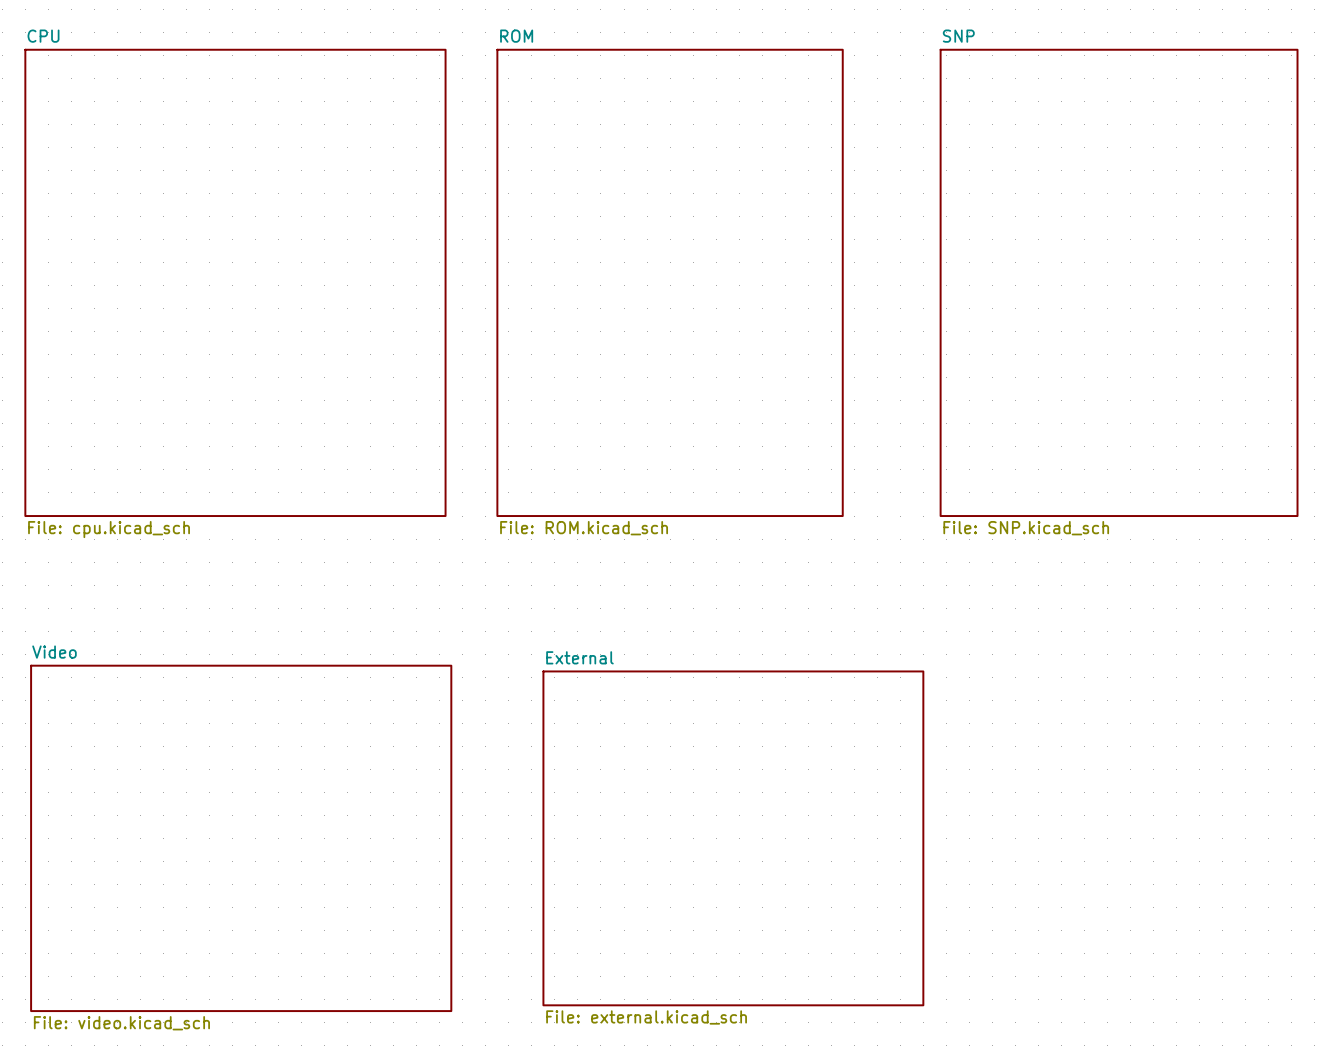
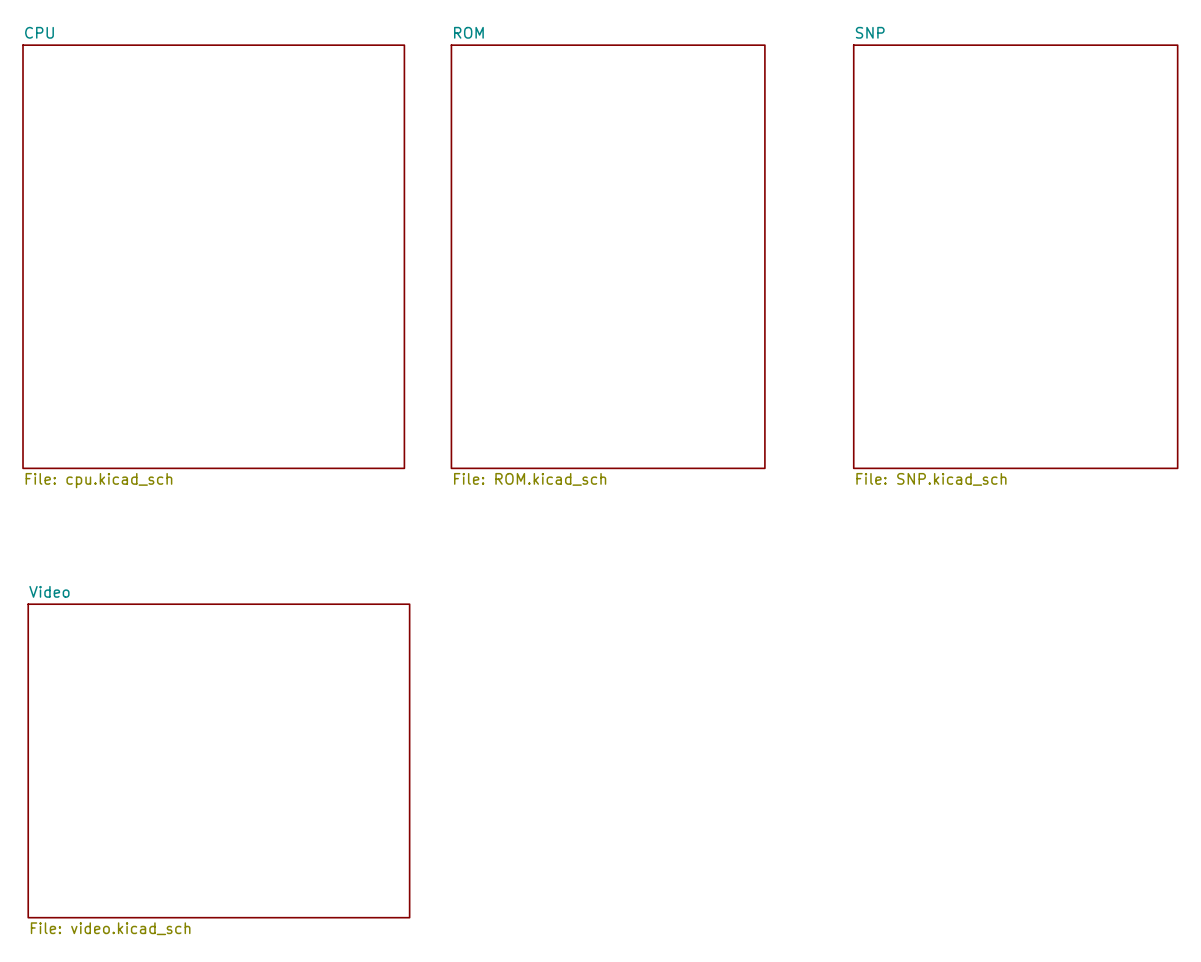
sheet External: File: external.kicad_sch (733, 838) -> none

